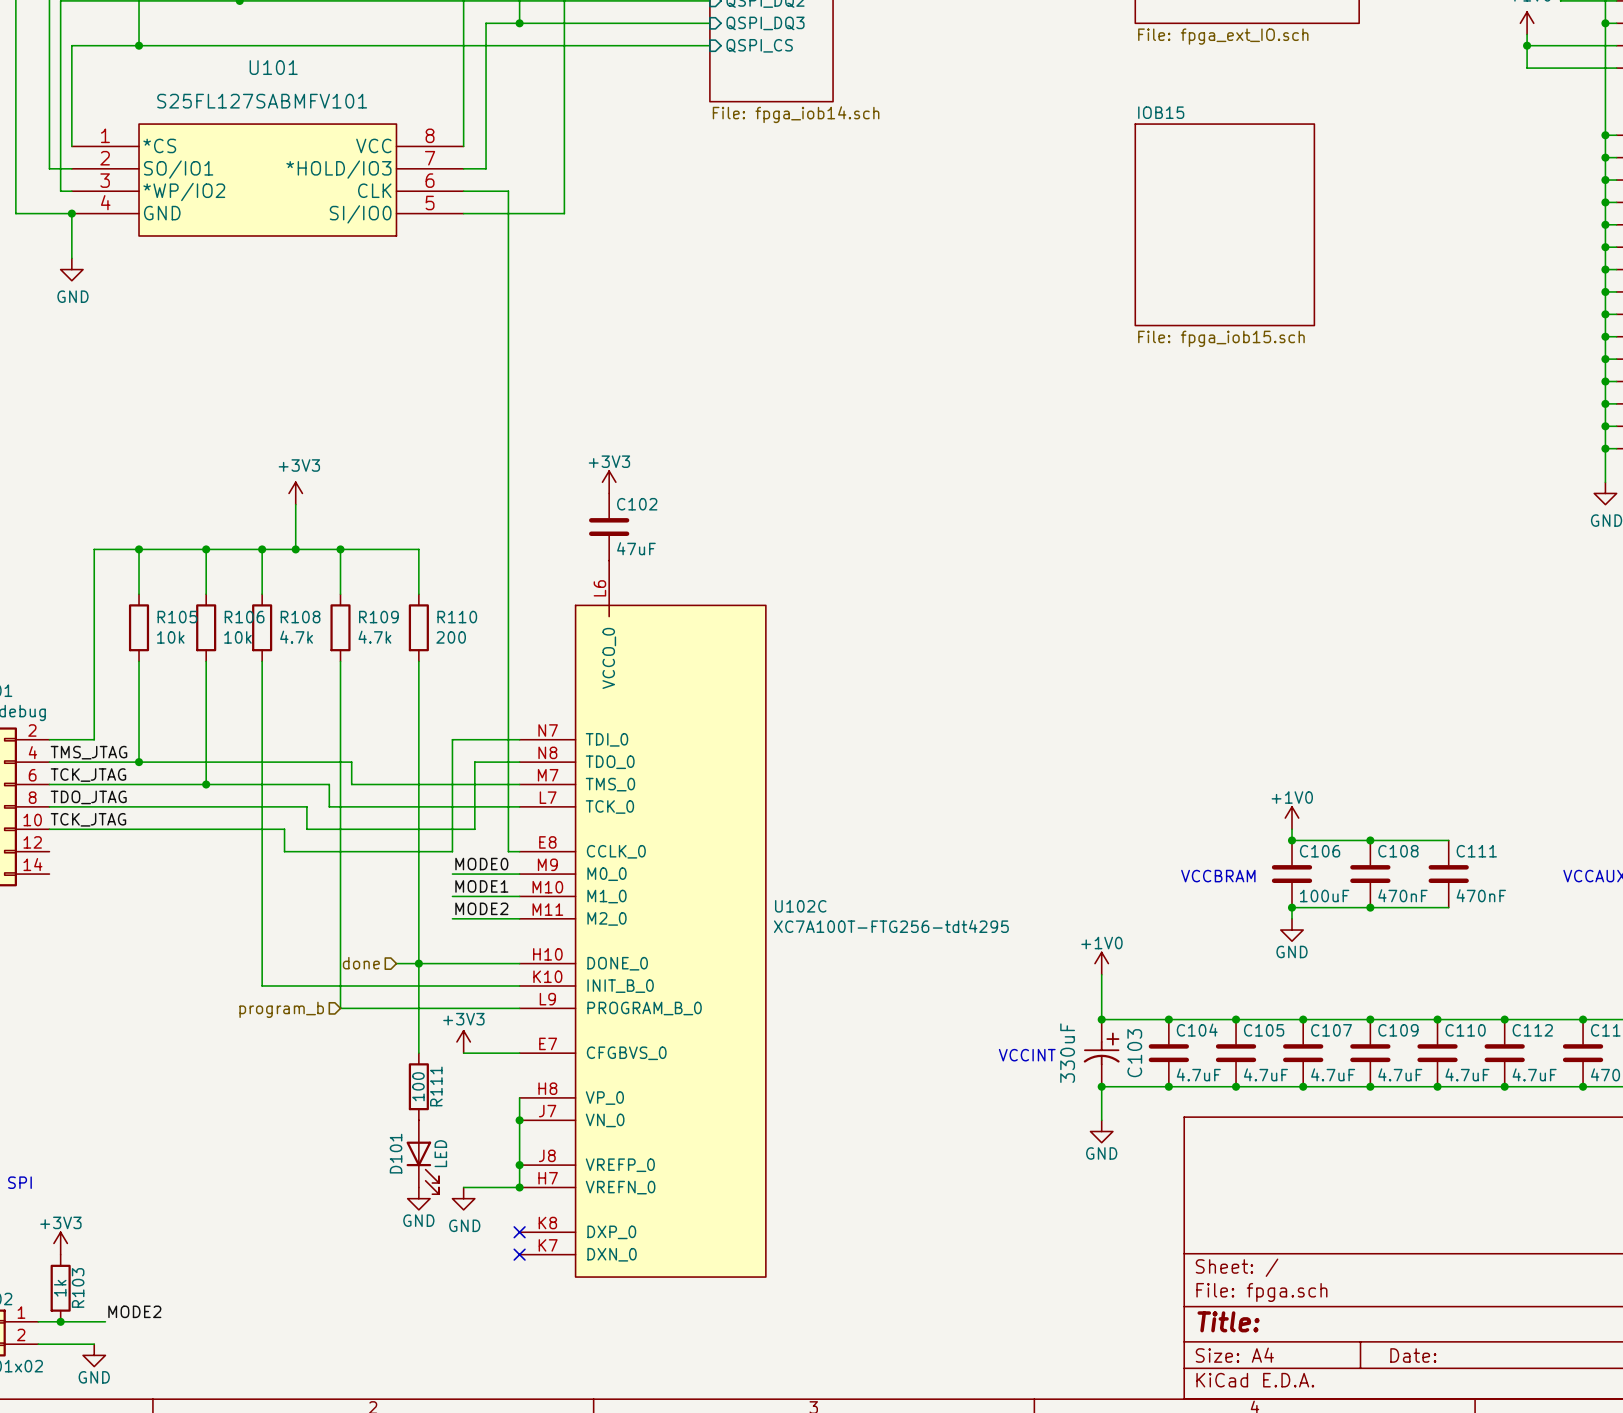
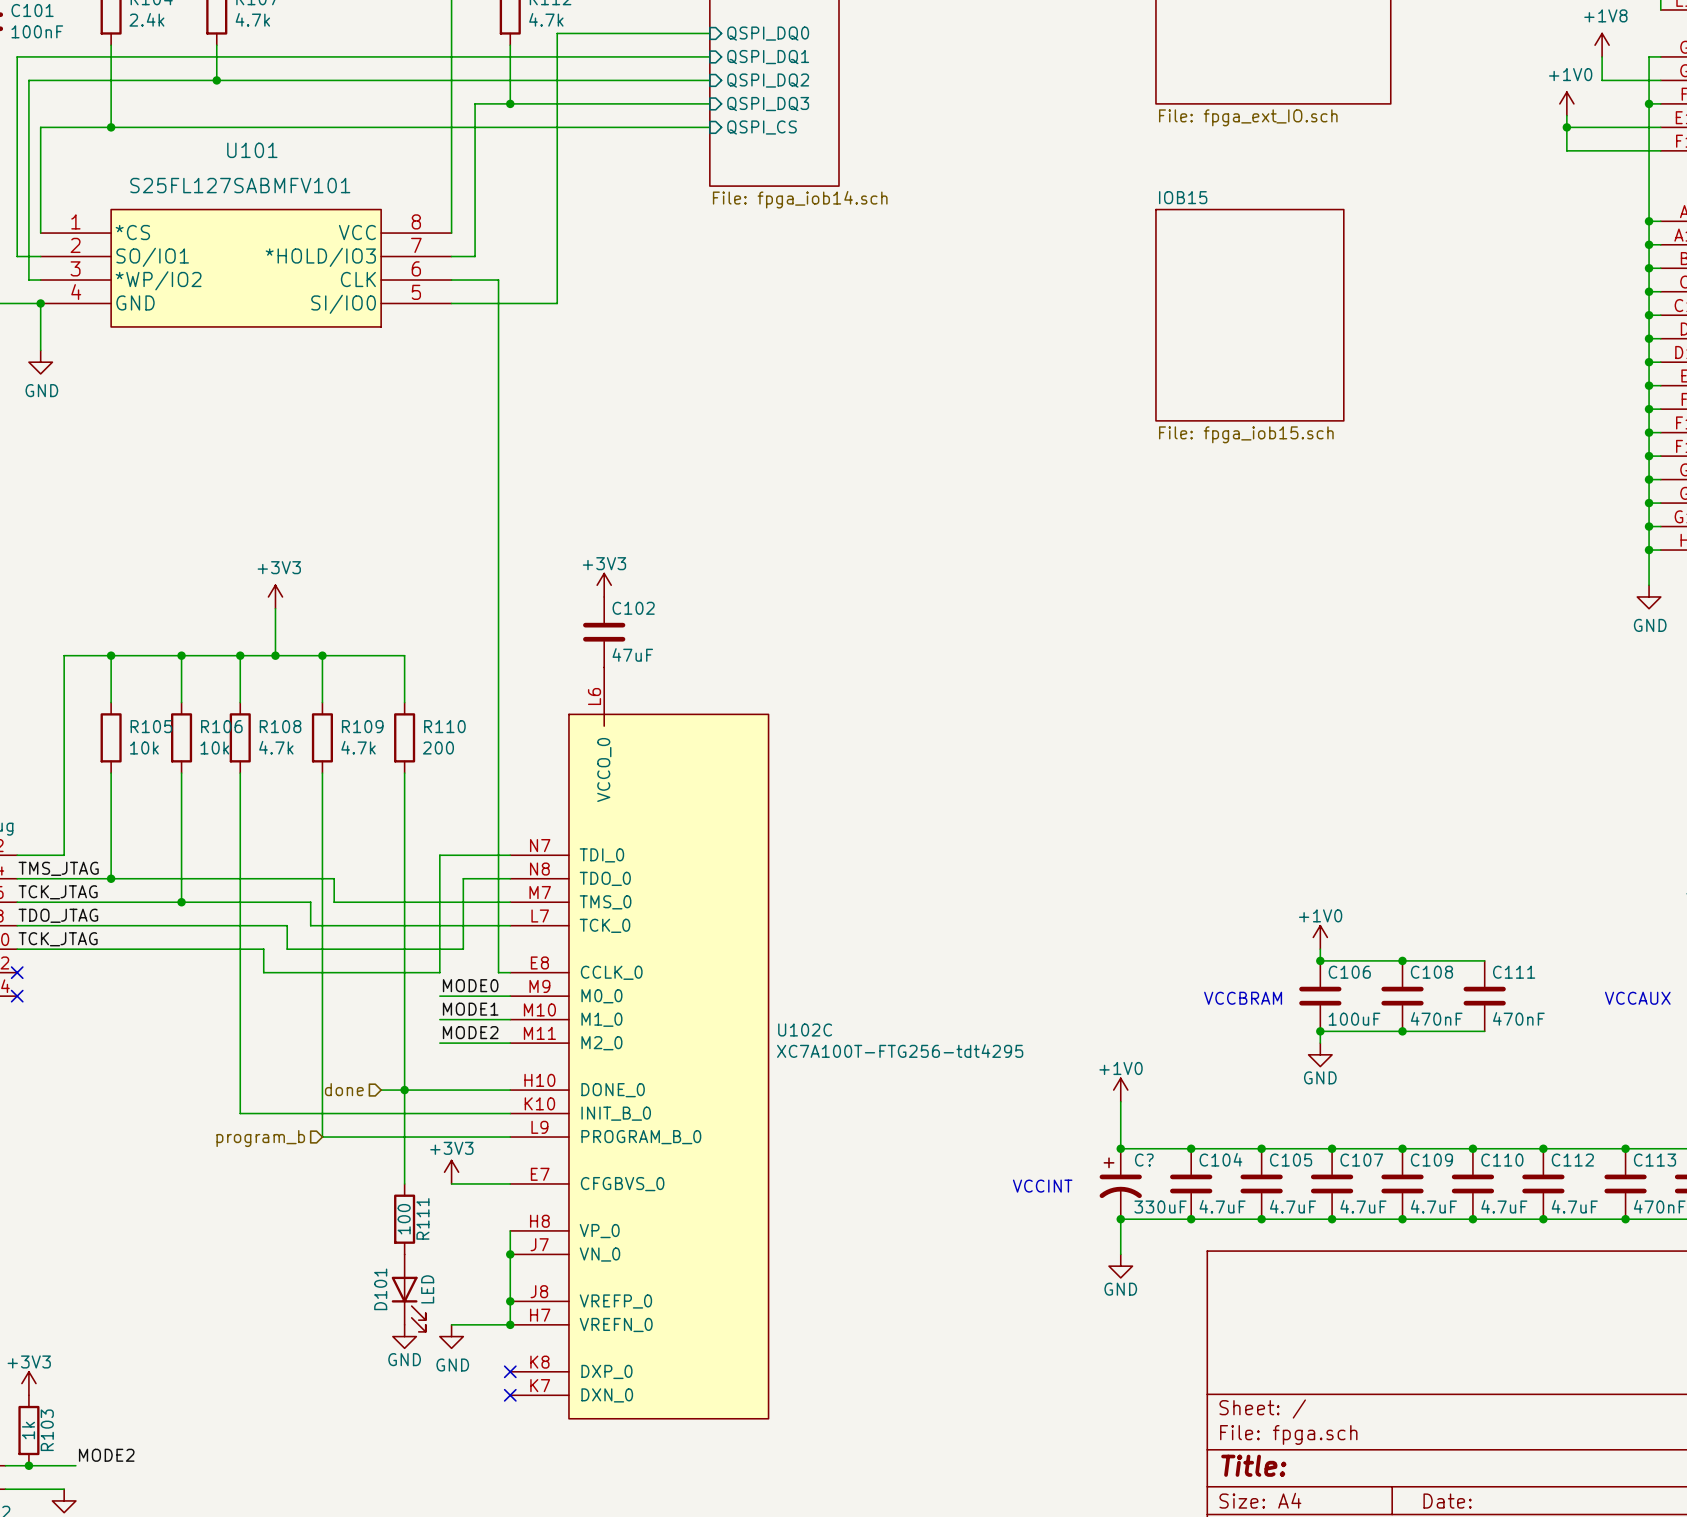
no-connect mark: none -> (17, 972)
no-connect mark: none -> (17, 996)
C103: 330uF (1101, 1053) -> none
C?: none -> 330uF (1120, 1183)

